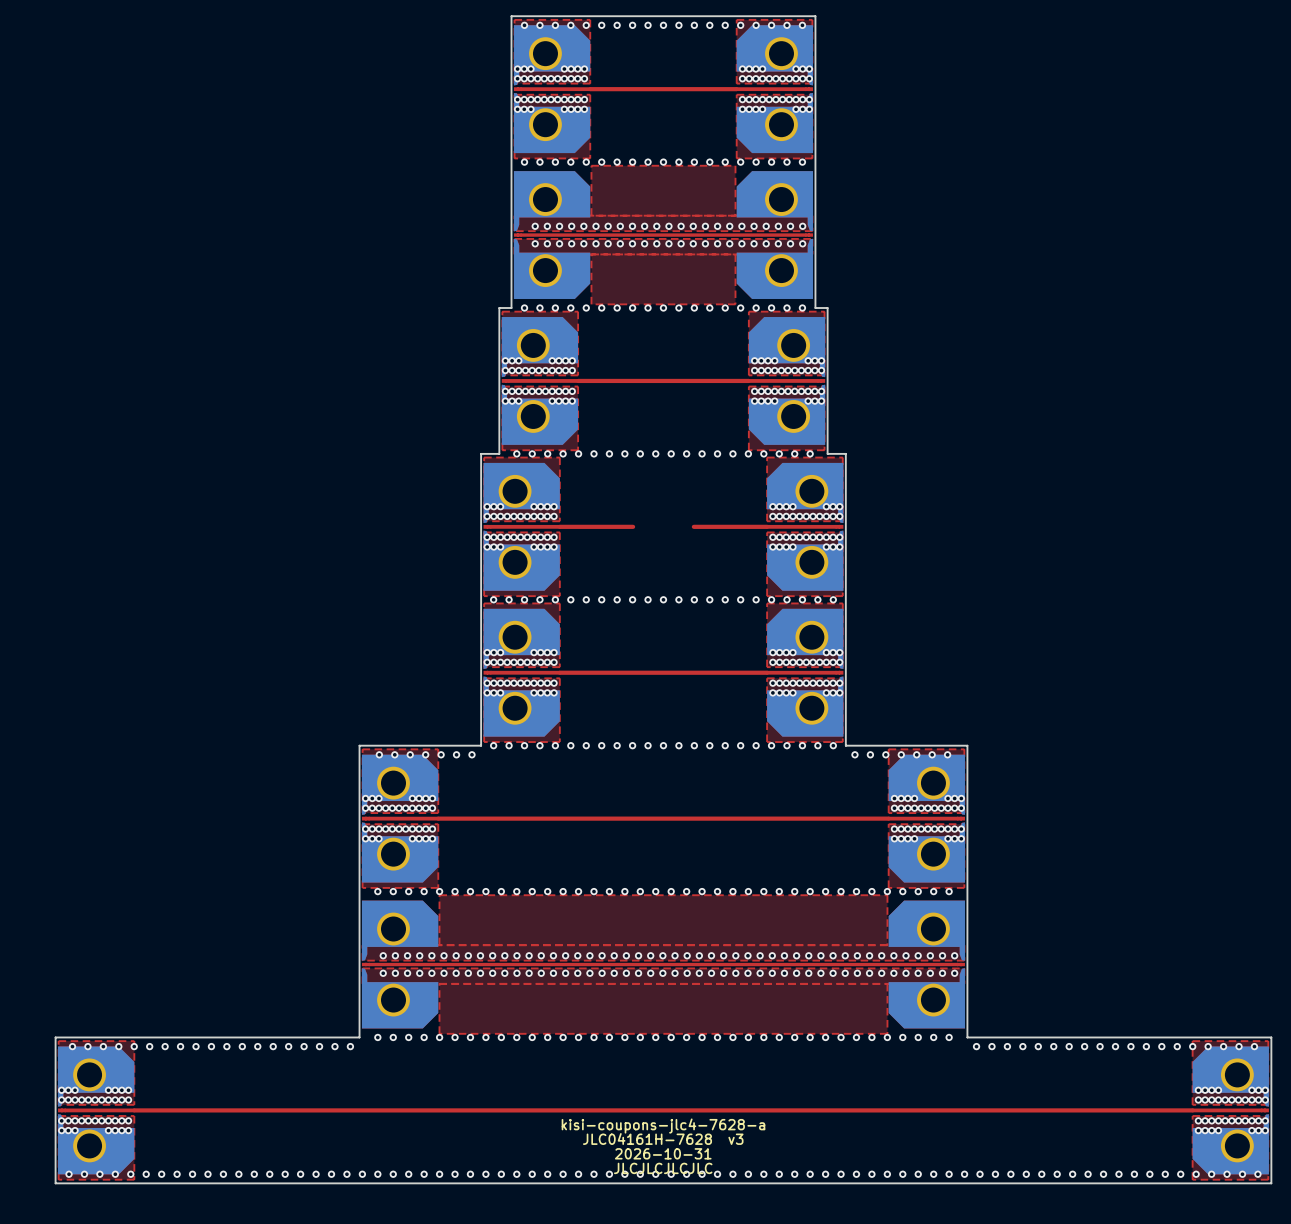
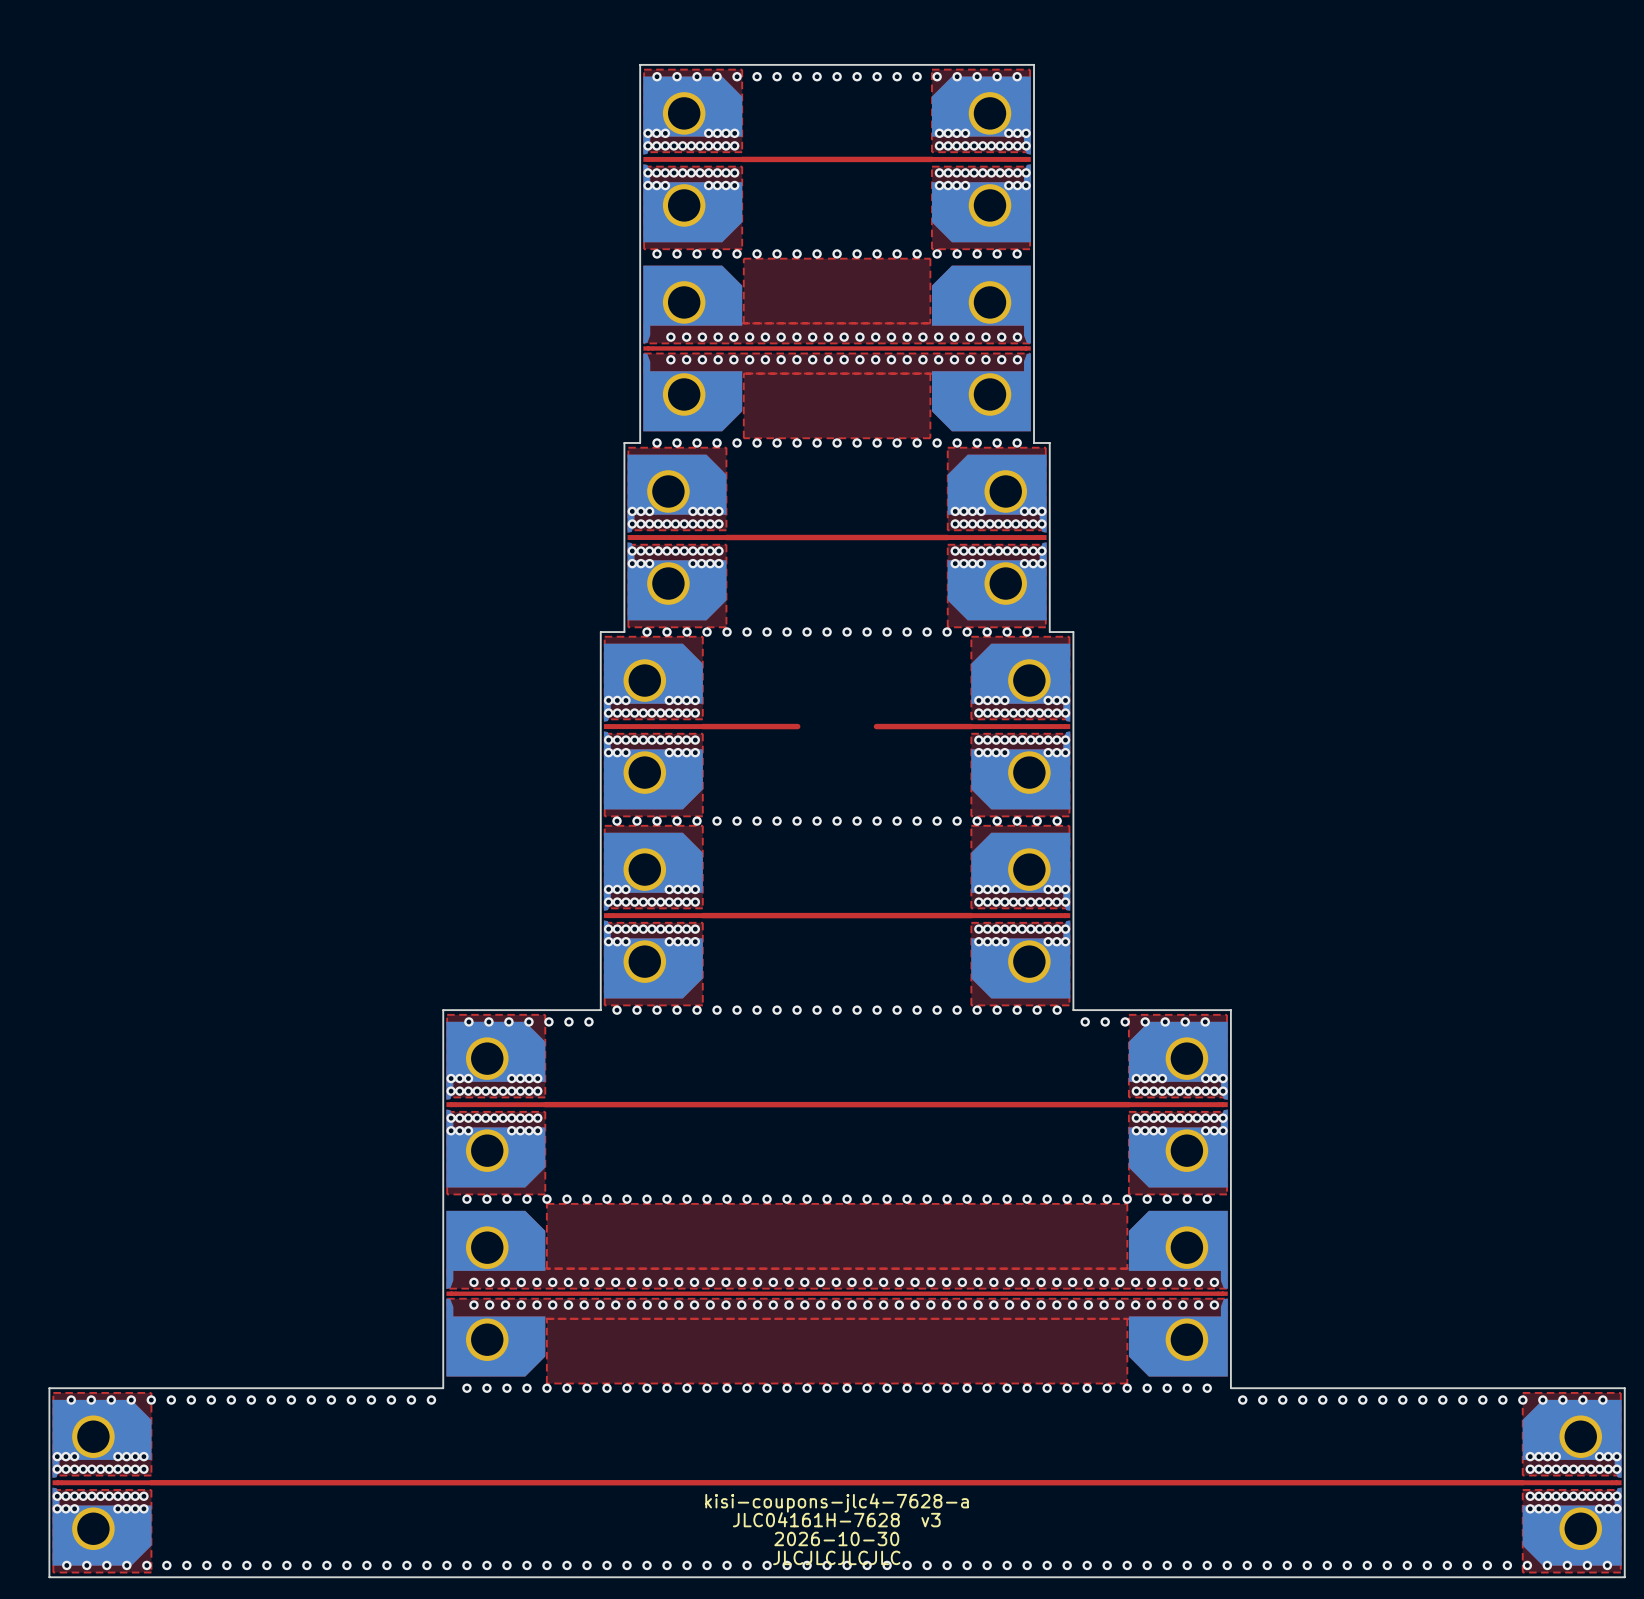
text: 2026-10-31 (663, 1153) -> 2026-10-30 (836, 1538)

